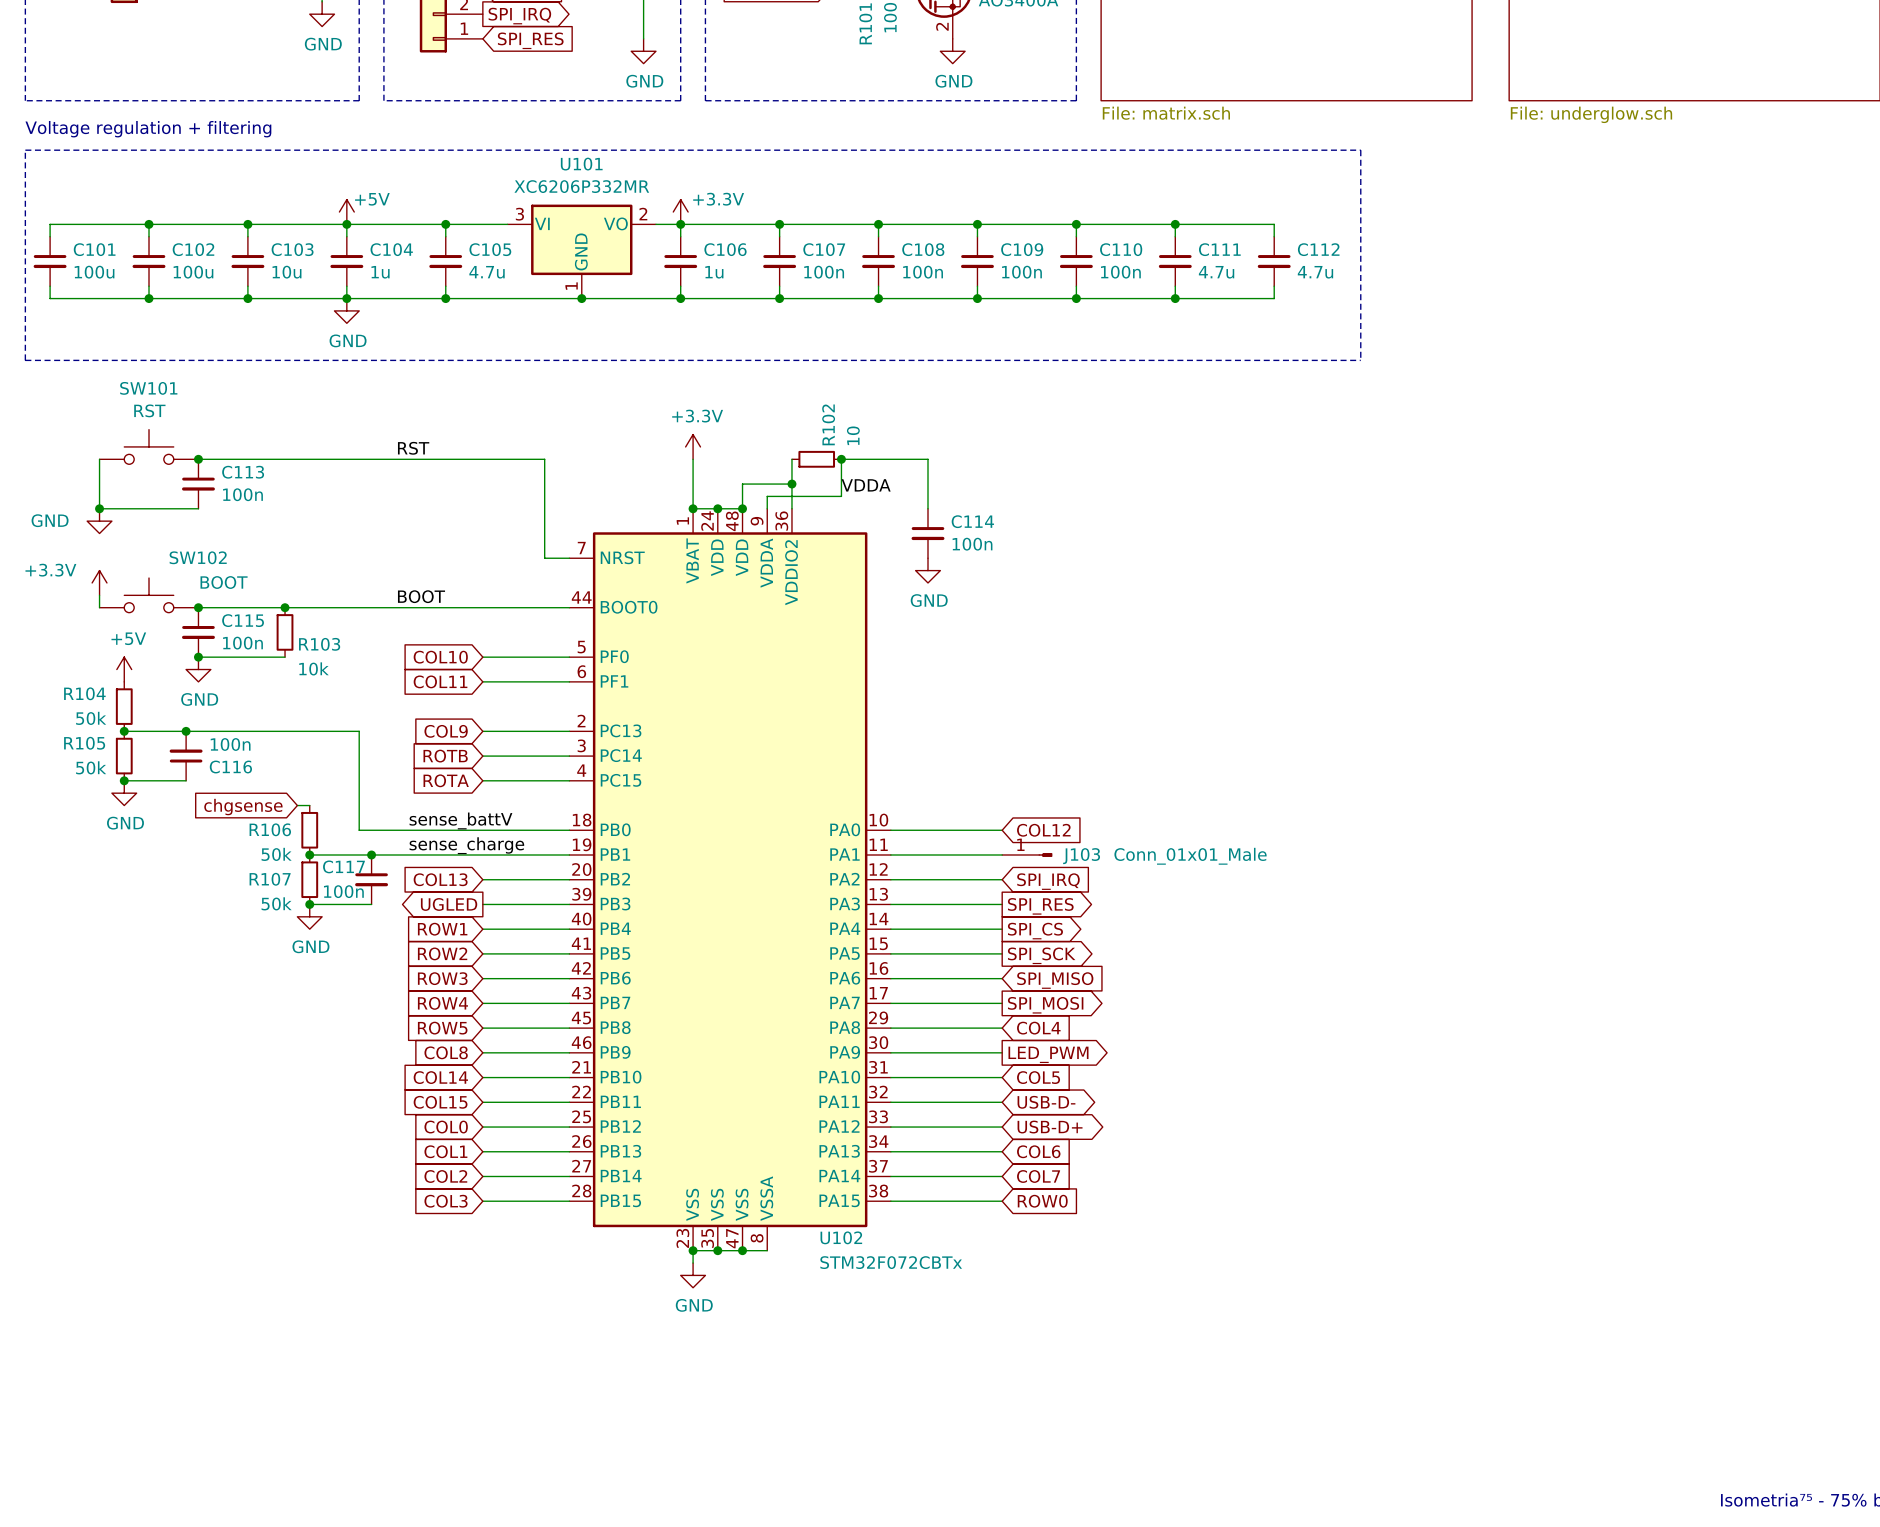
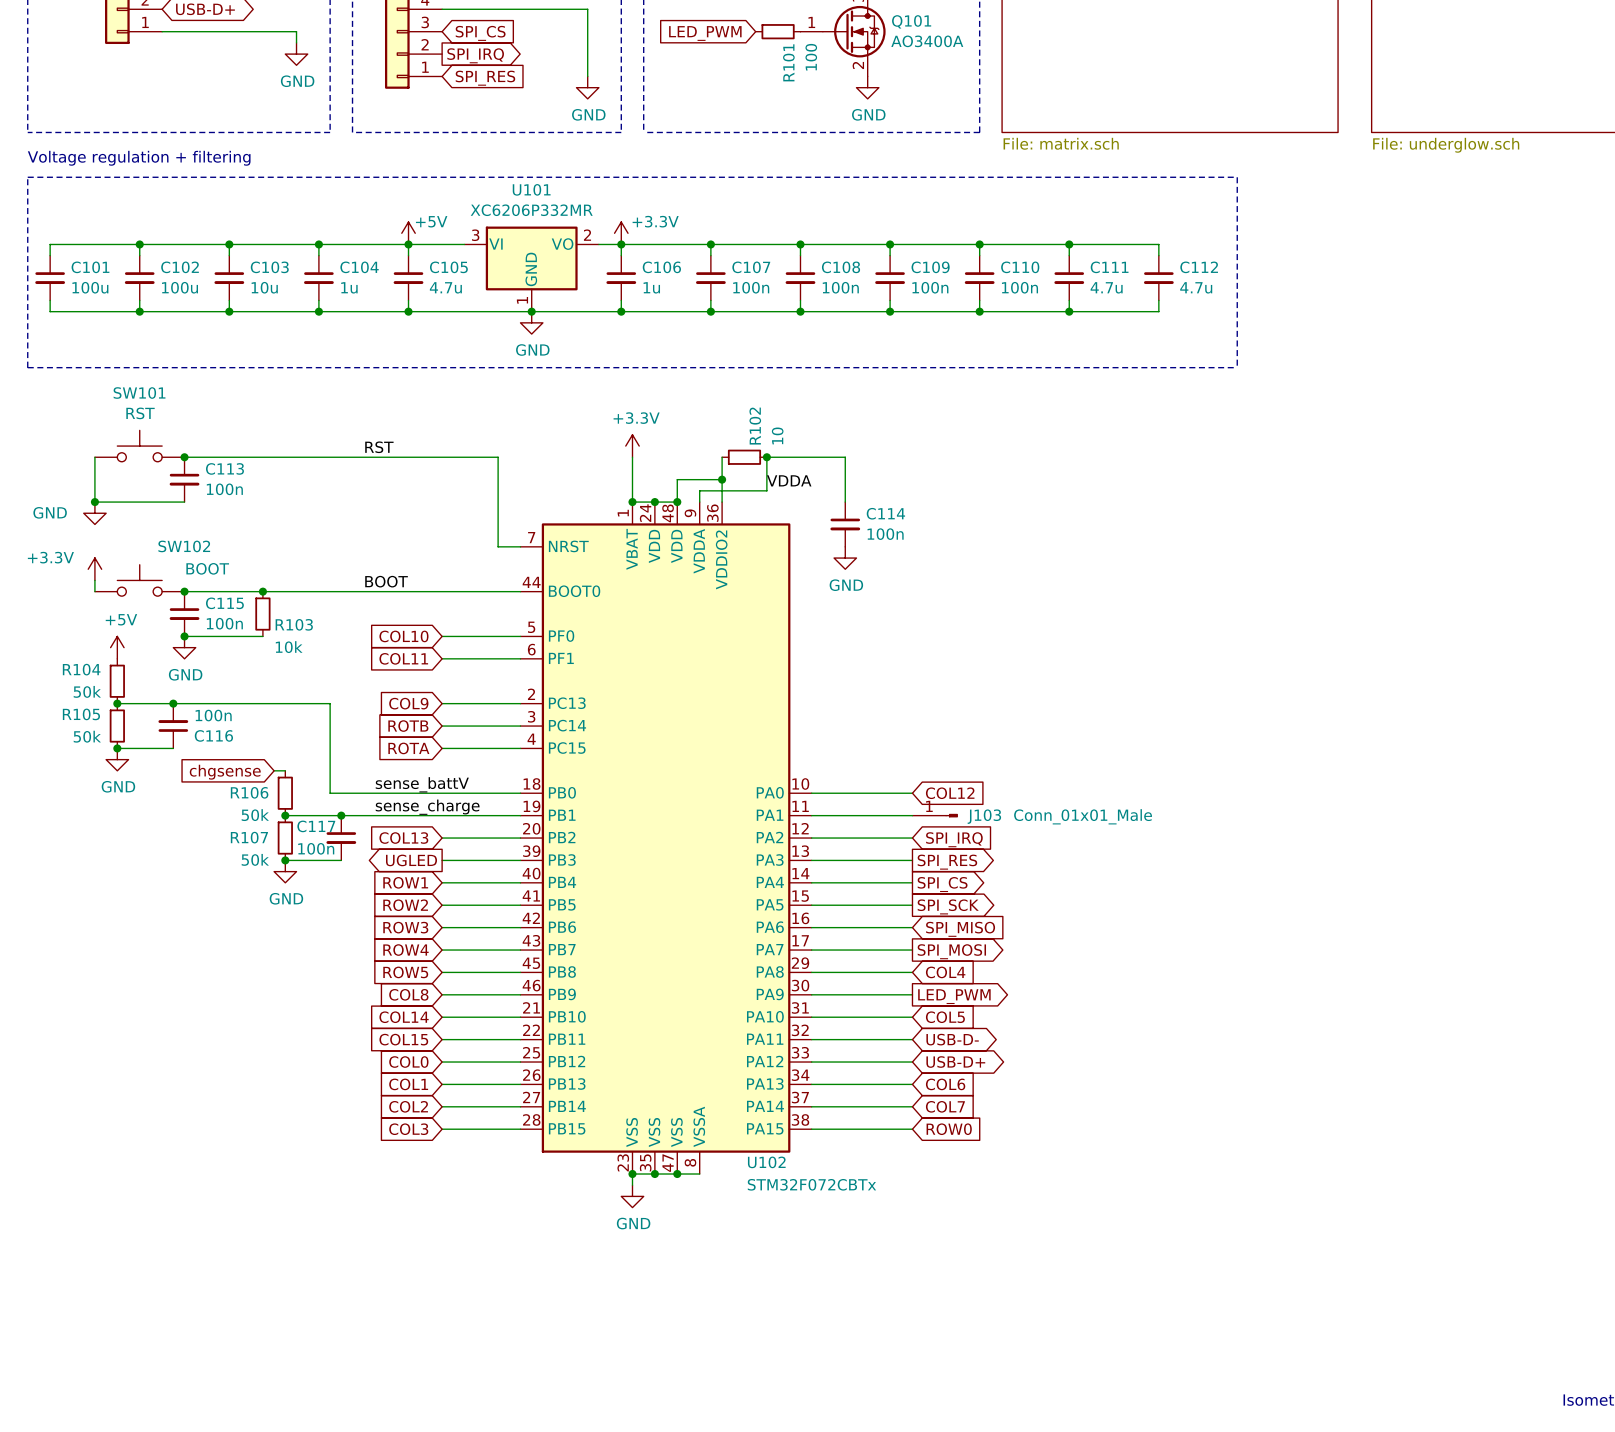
power symbol position: +5V (346, 212) -> +5V (408, 233)
power symbol position: GND (346, 310) -> GND (531, 322)

